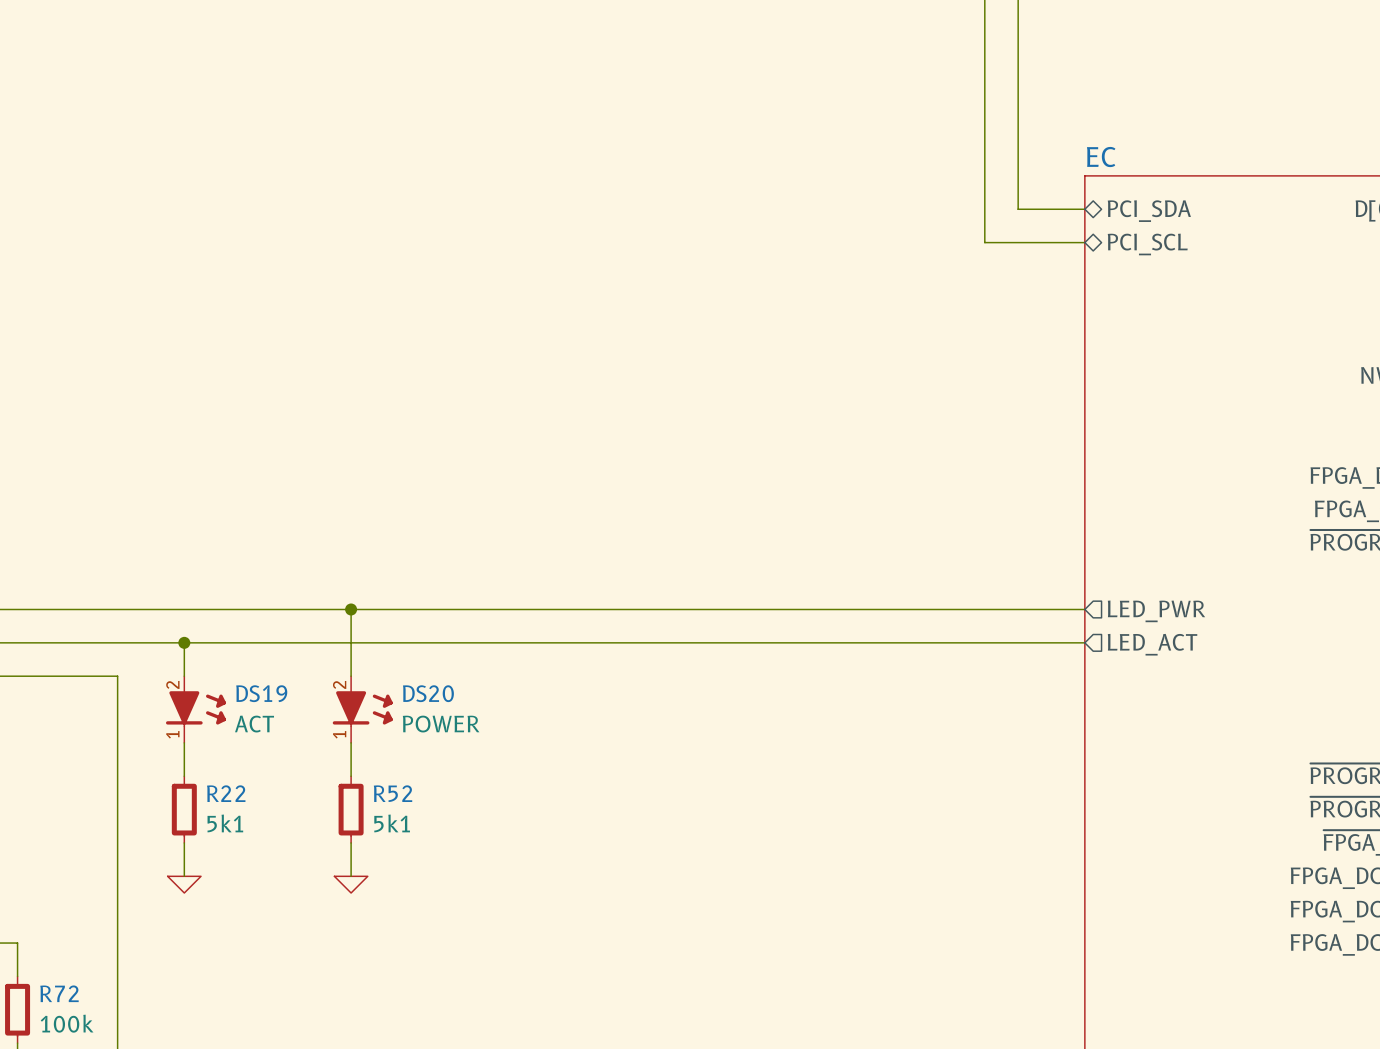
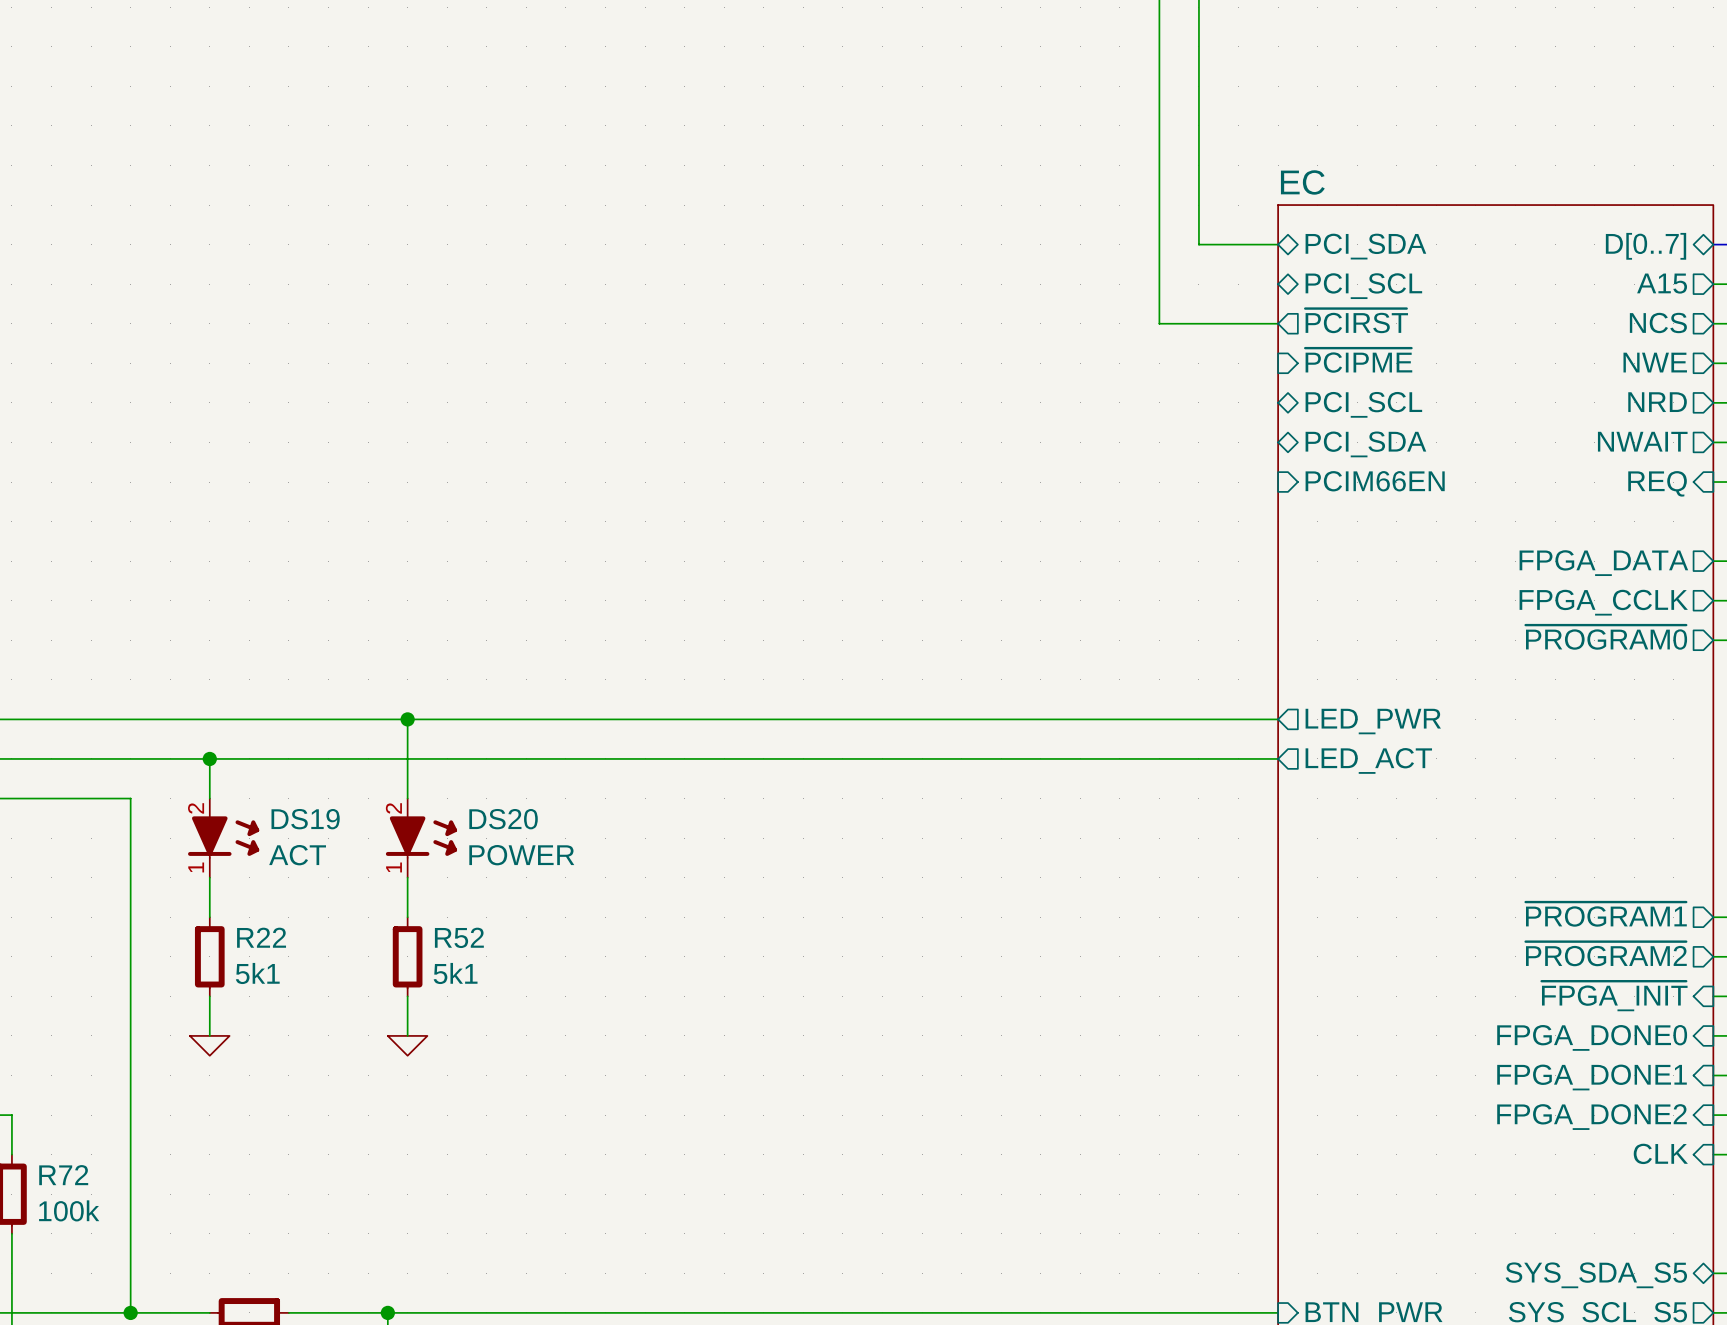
wire: (984, 242) (1084, 242) -> (1159, 284) (1159, 323) (1278, 323)
sheet pin: none -> ~{PCIRST} (1356, 320)
sheet pin: none -> ~{PCIPME} (1358, 360)
sheet pin: none -> PCI_SCL (1363, 404)
sheet pin: none -> PCI_SDA (1365, 444)
sheet pin: none -> PCIM66EN (1375, 481)

